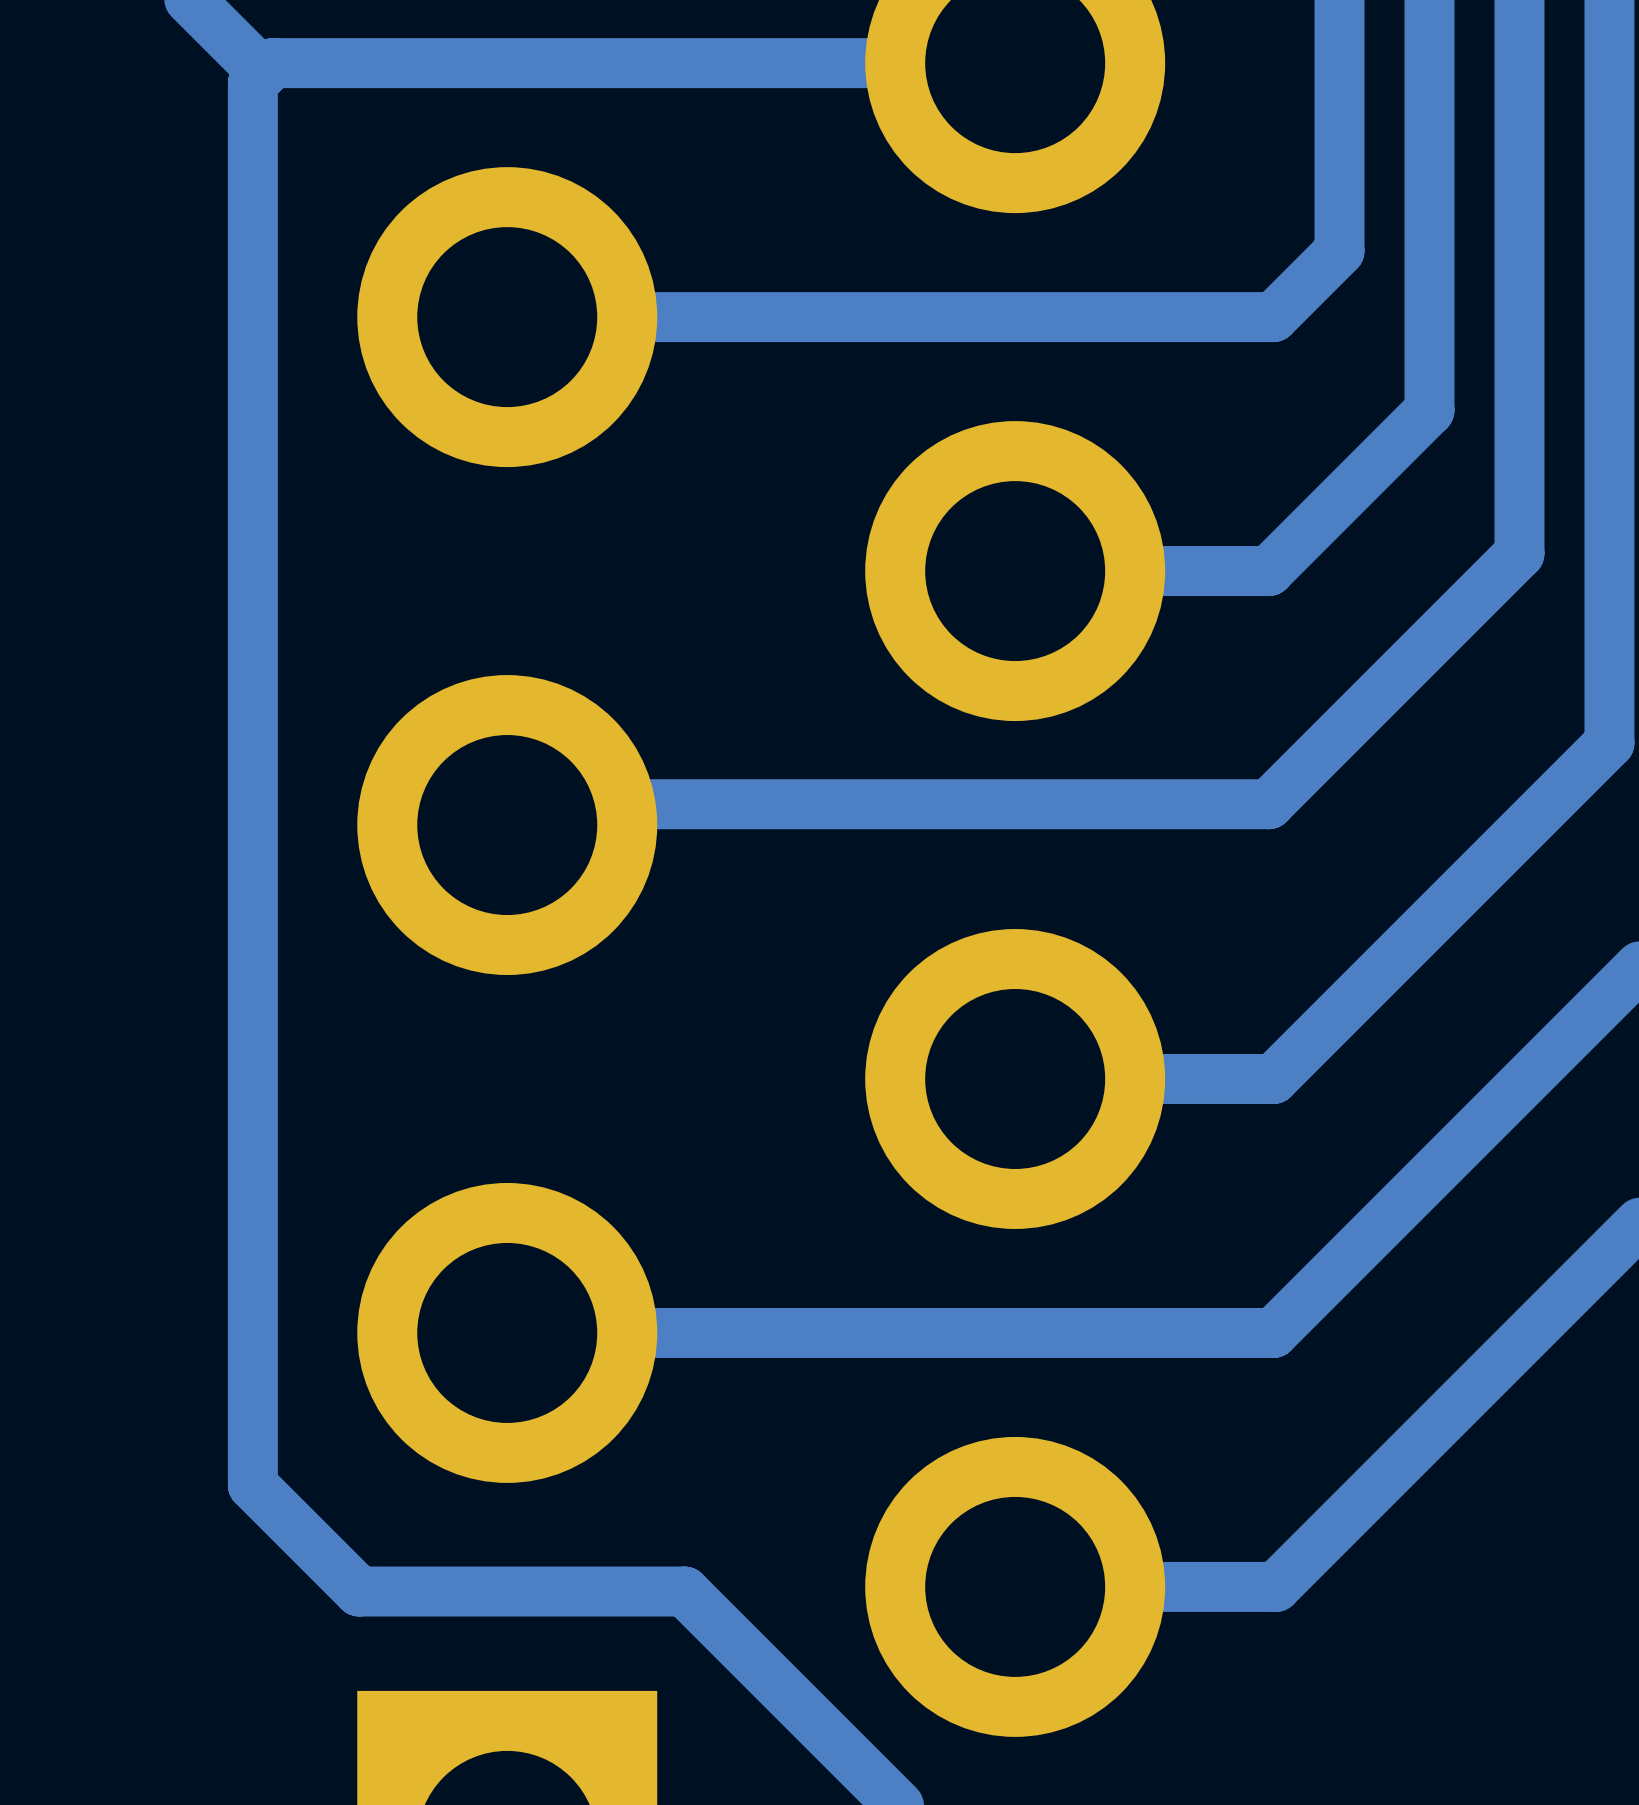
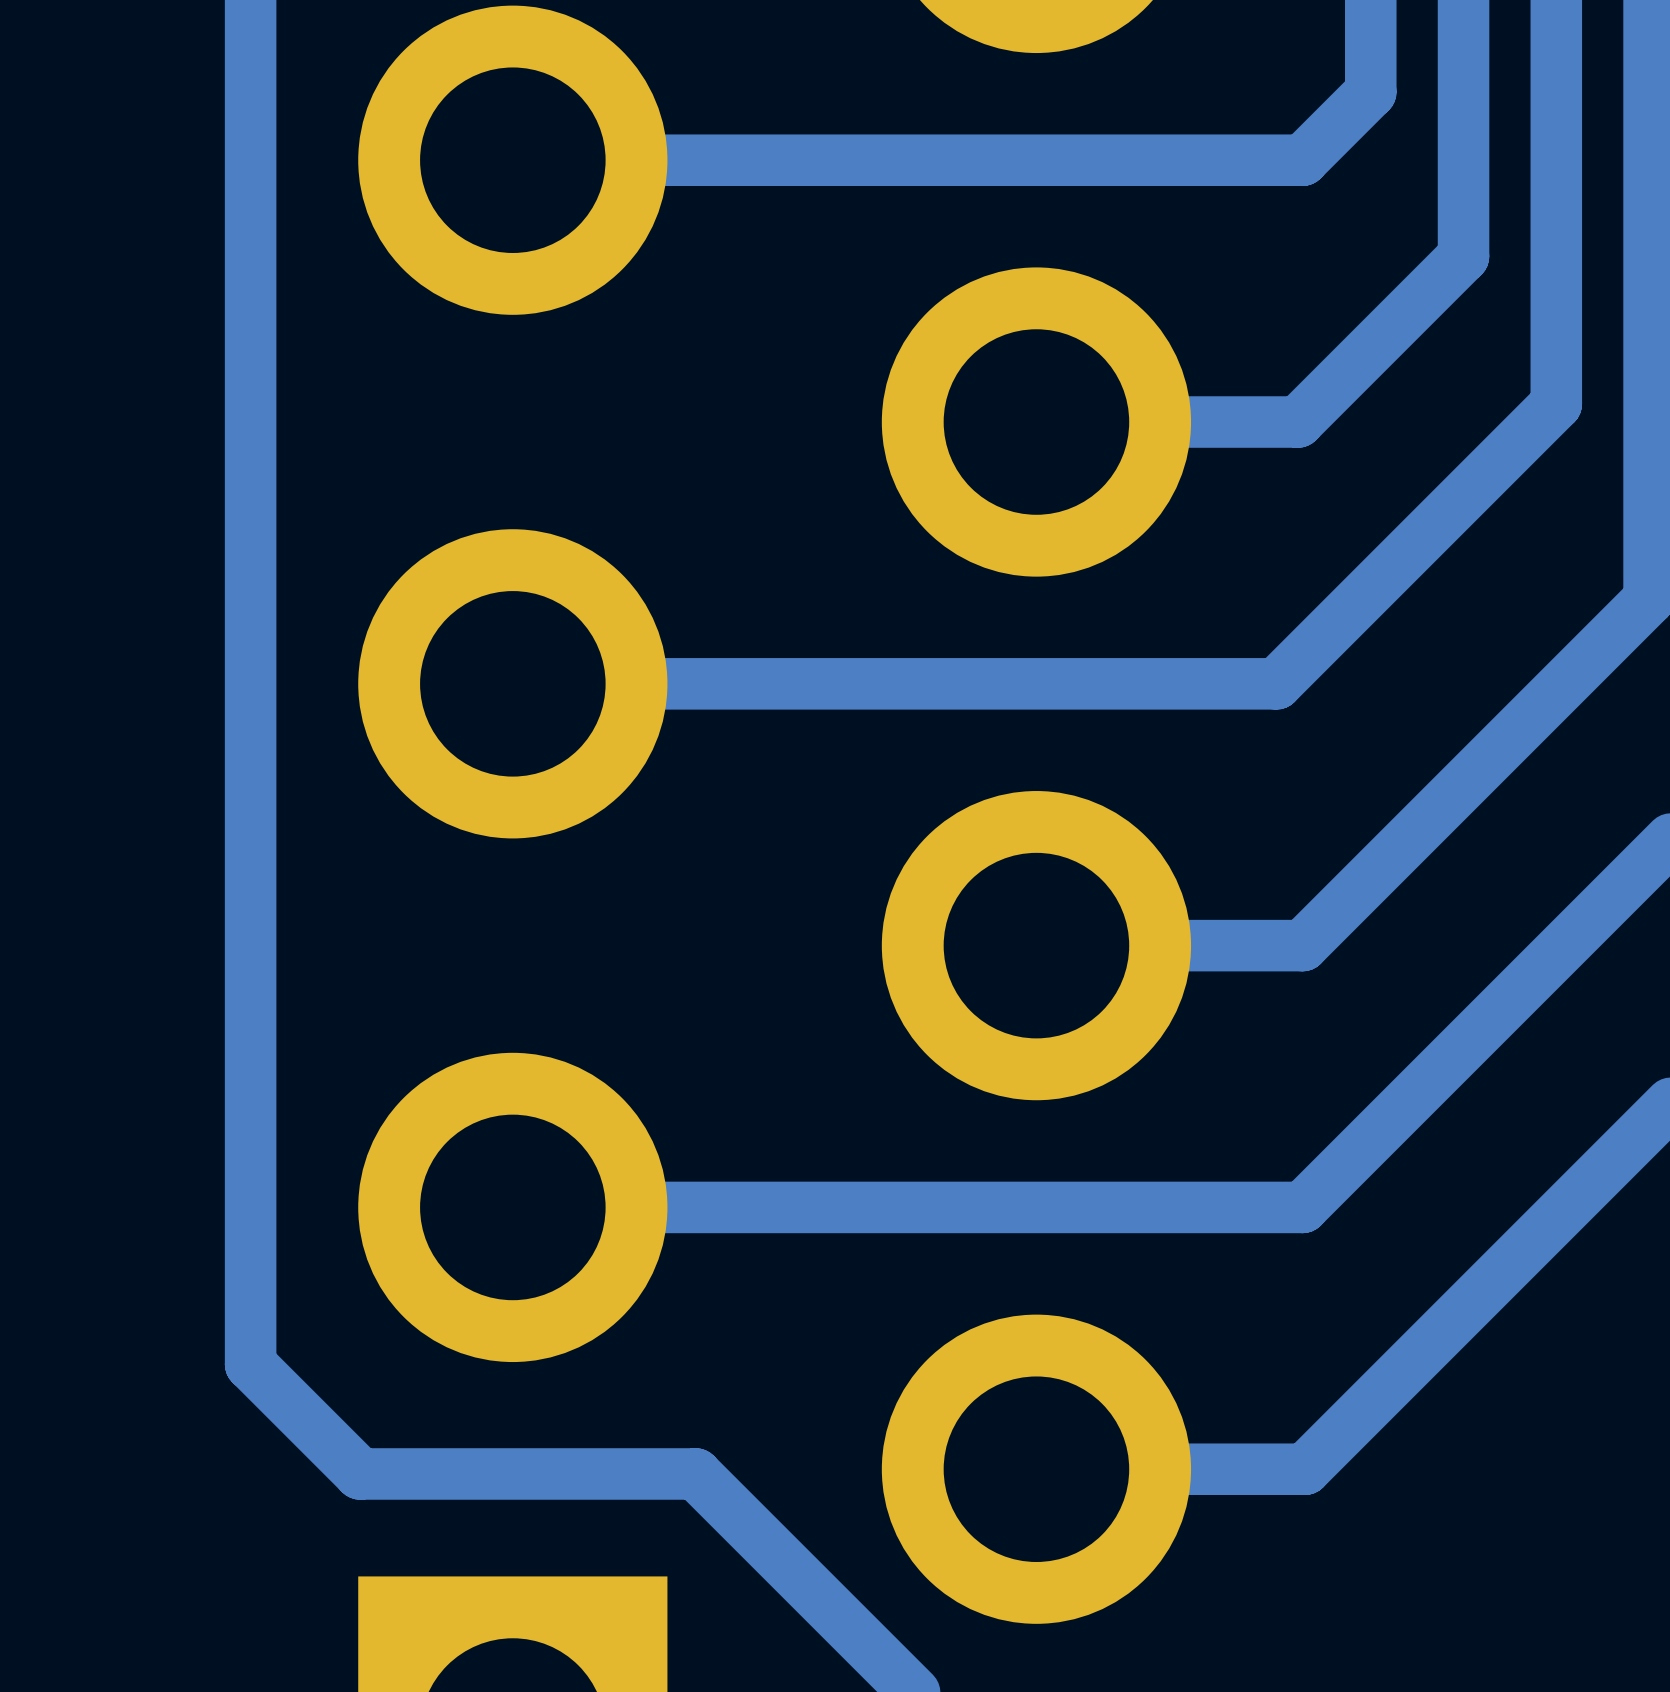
bottom track: (1268, 804) (528, 804) (507, 825) -> (1297, 662) (1276, 683) (512, 683)

